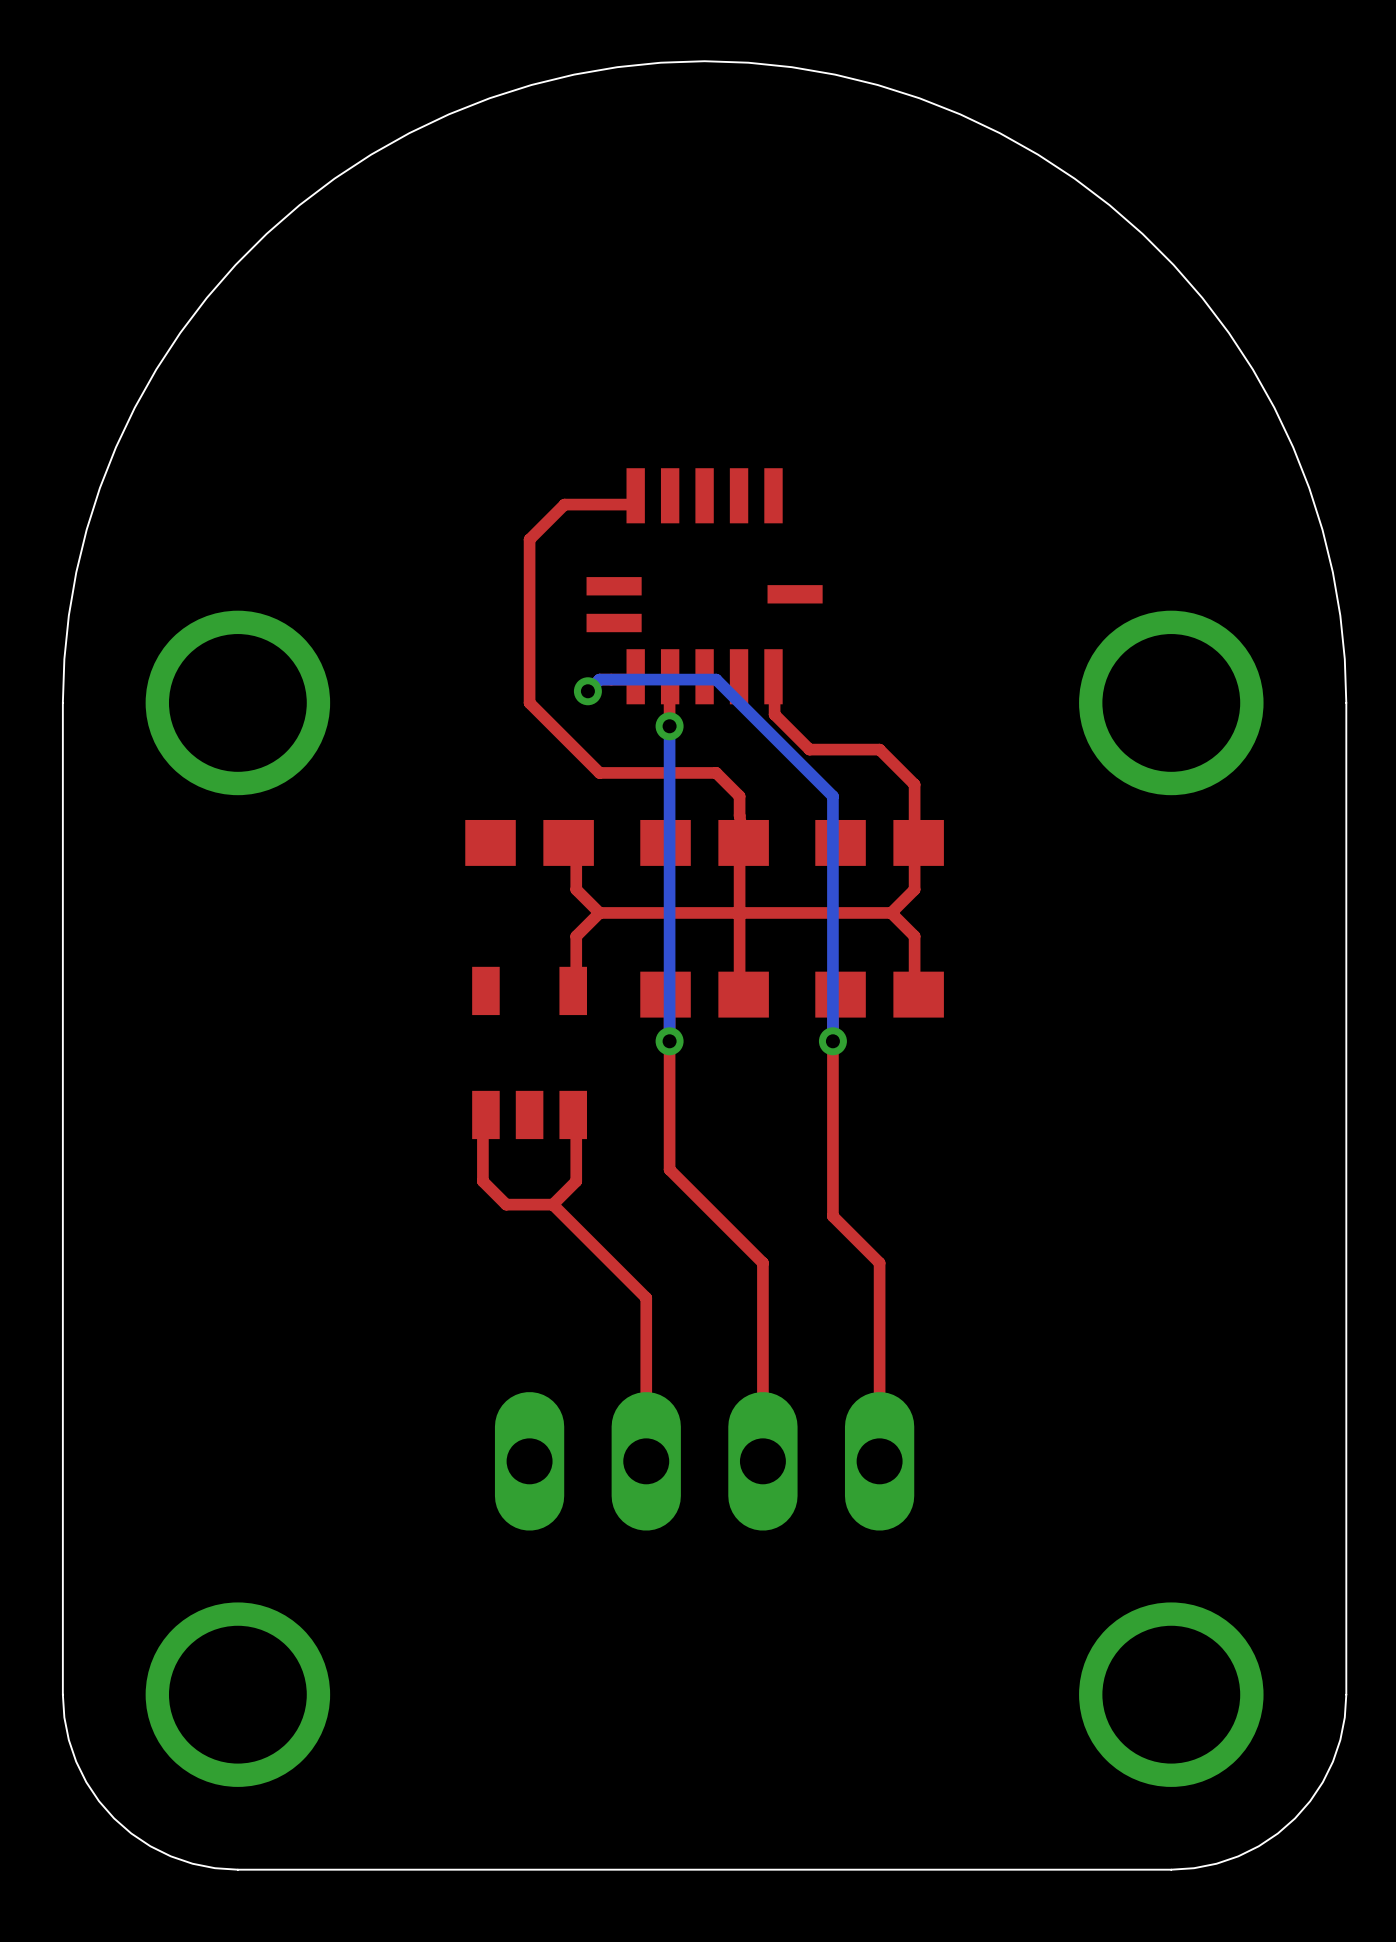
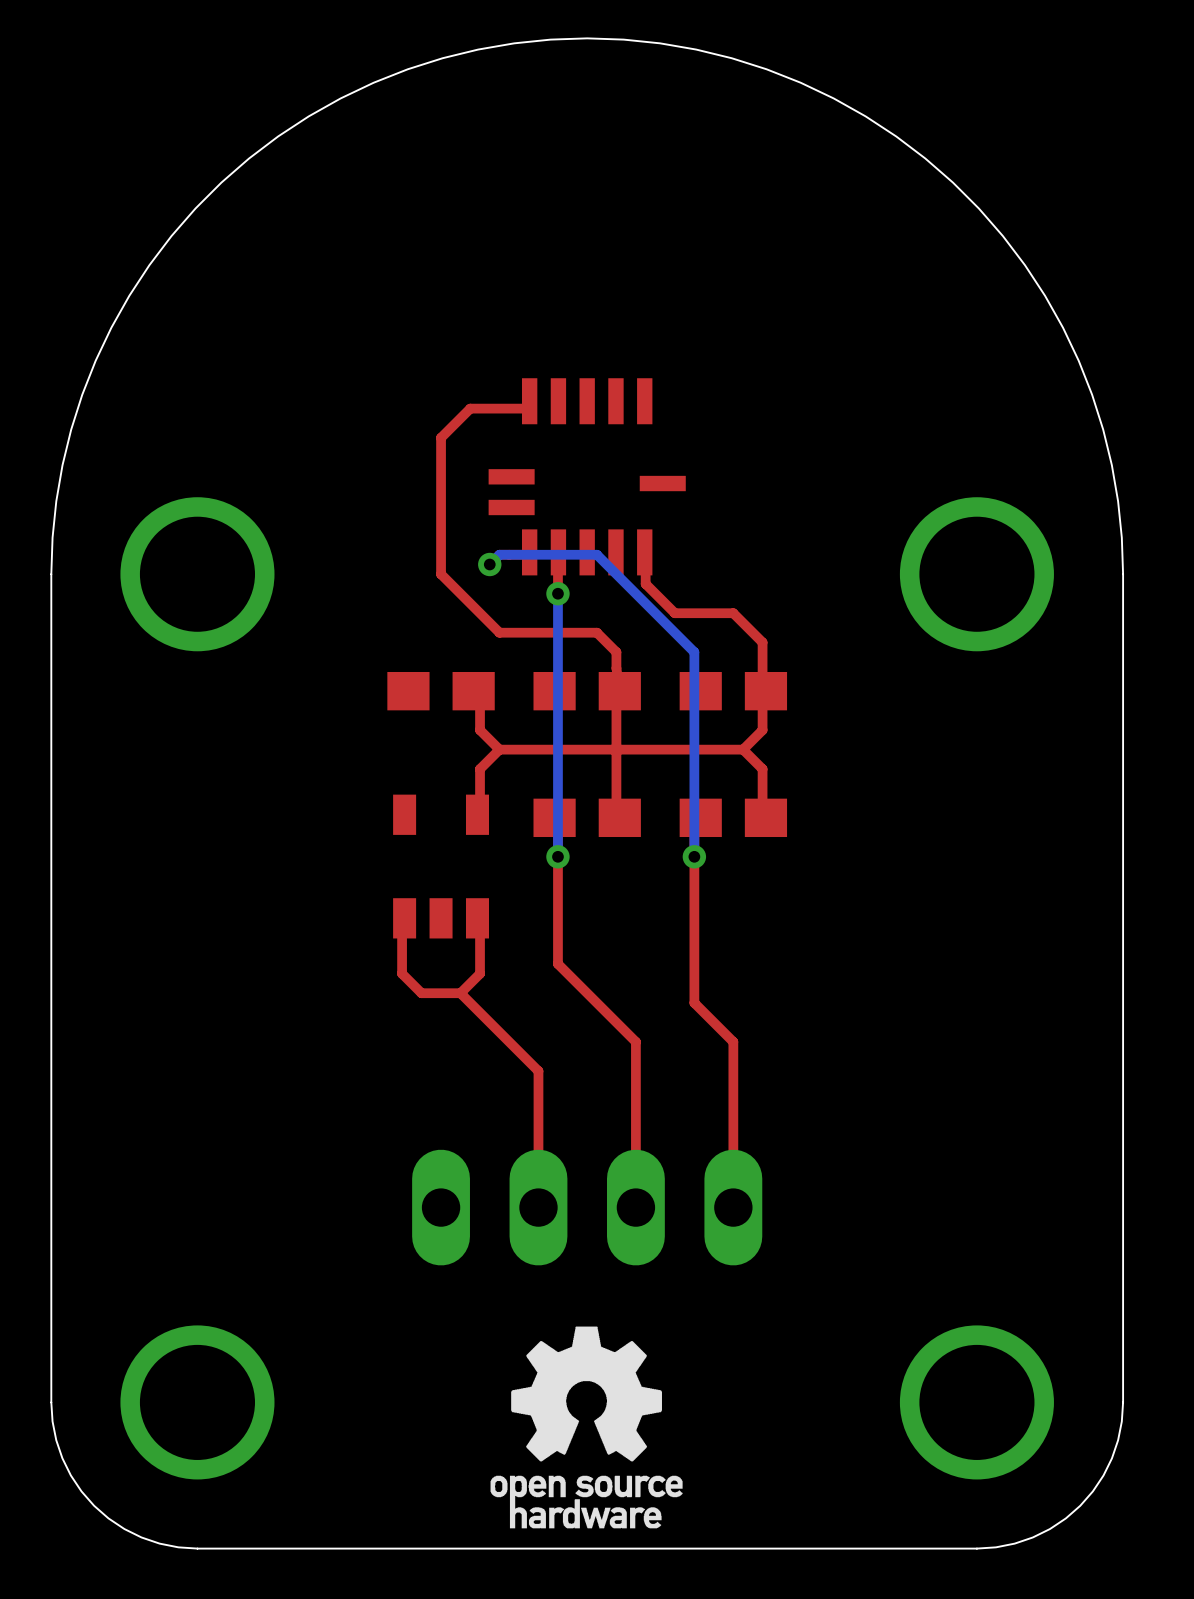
drawing: none -> [490, 1326, 683, 1529]

